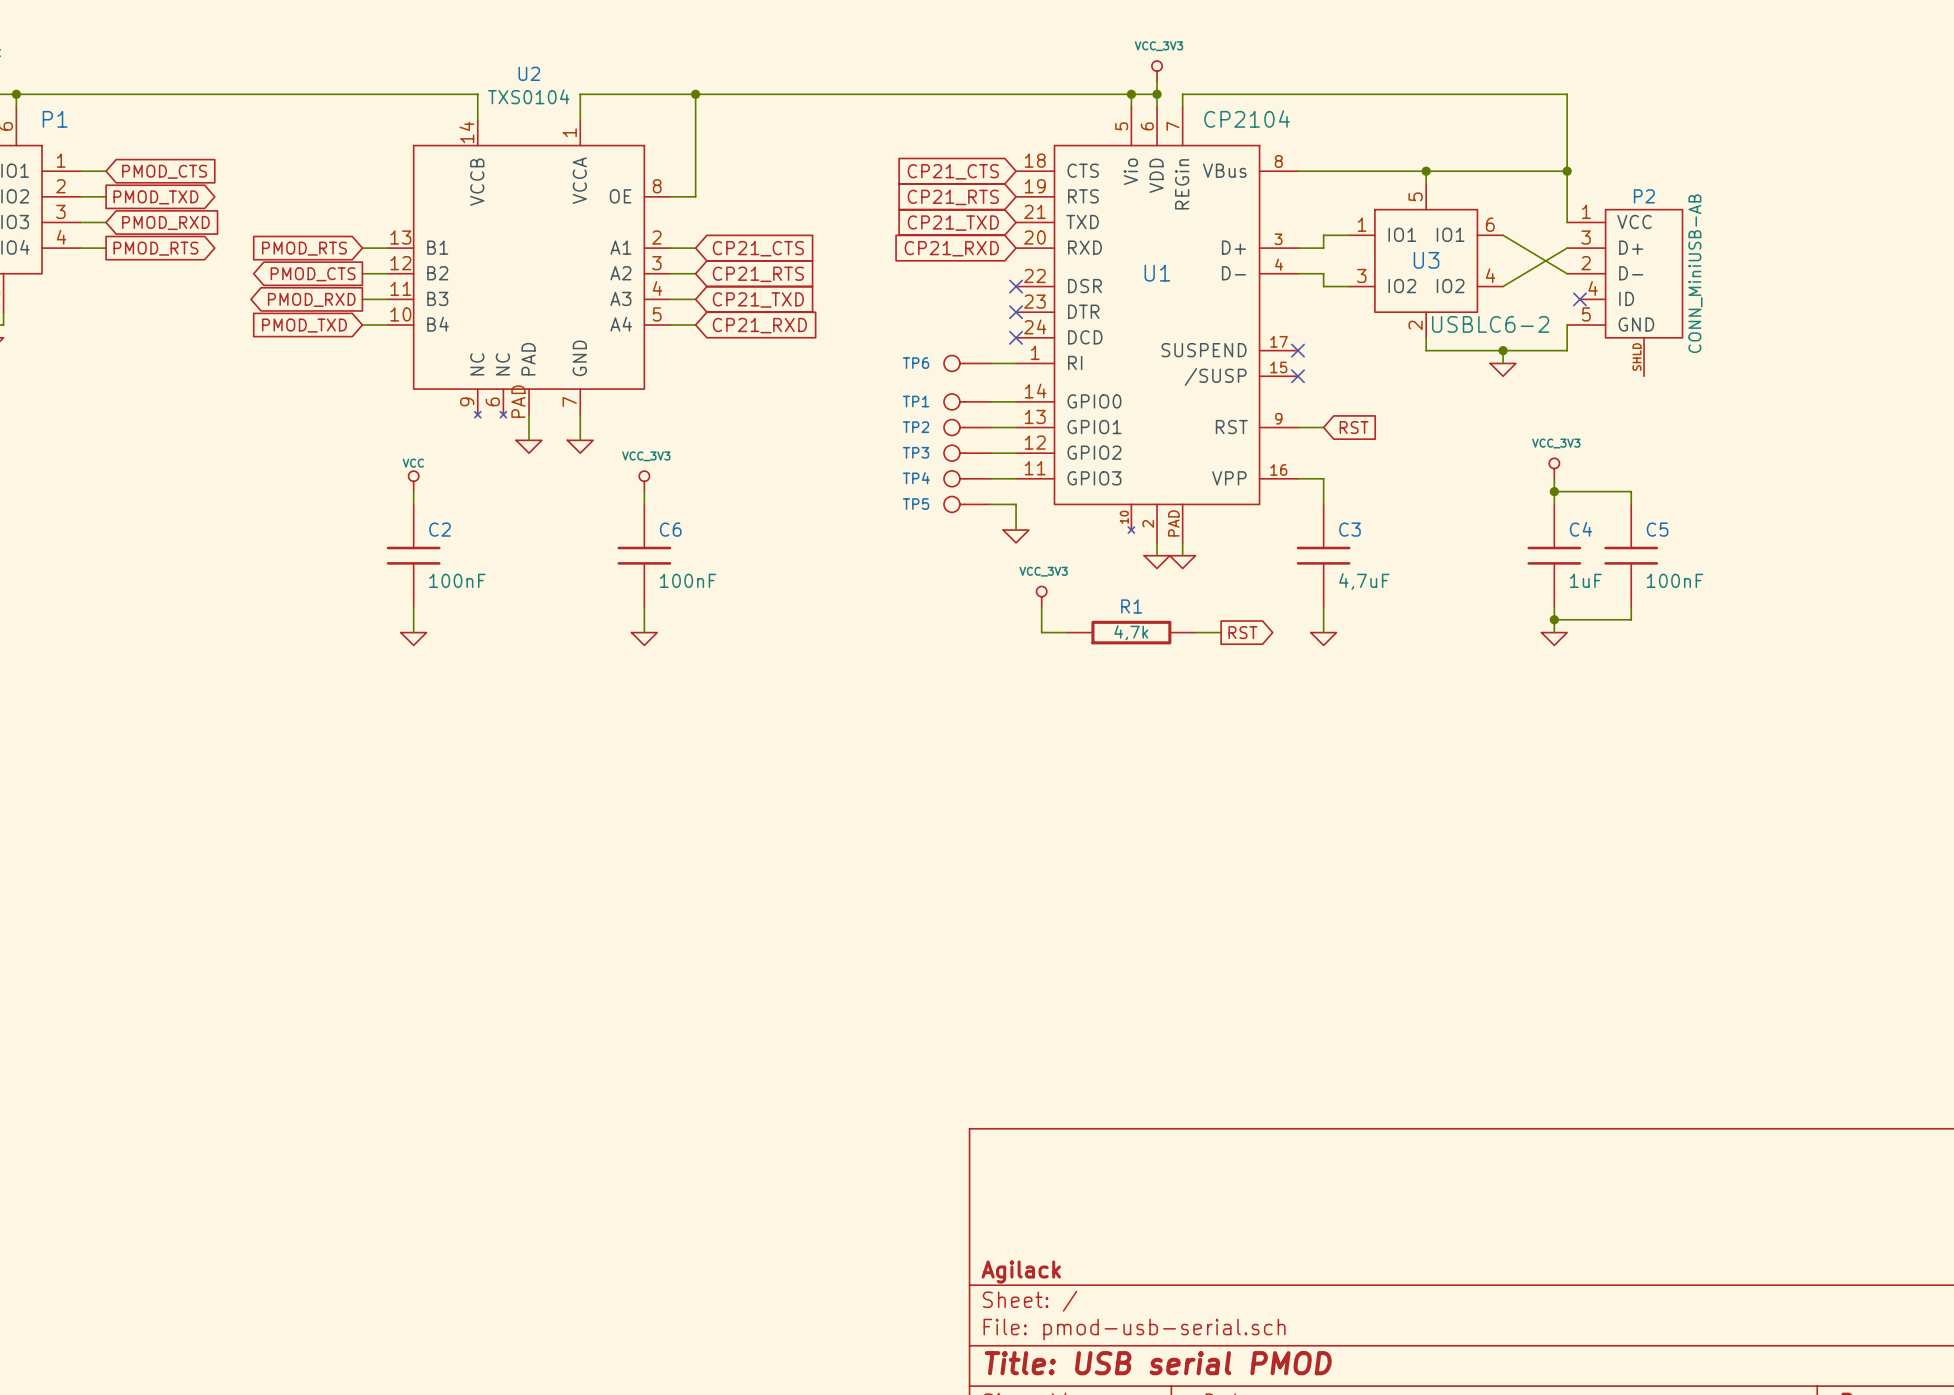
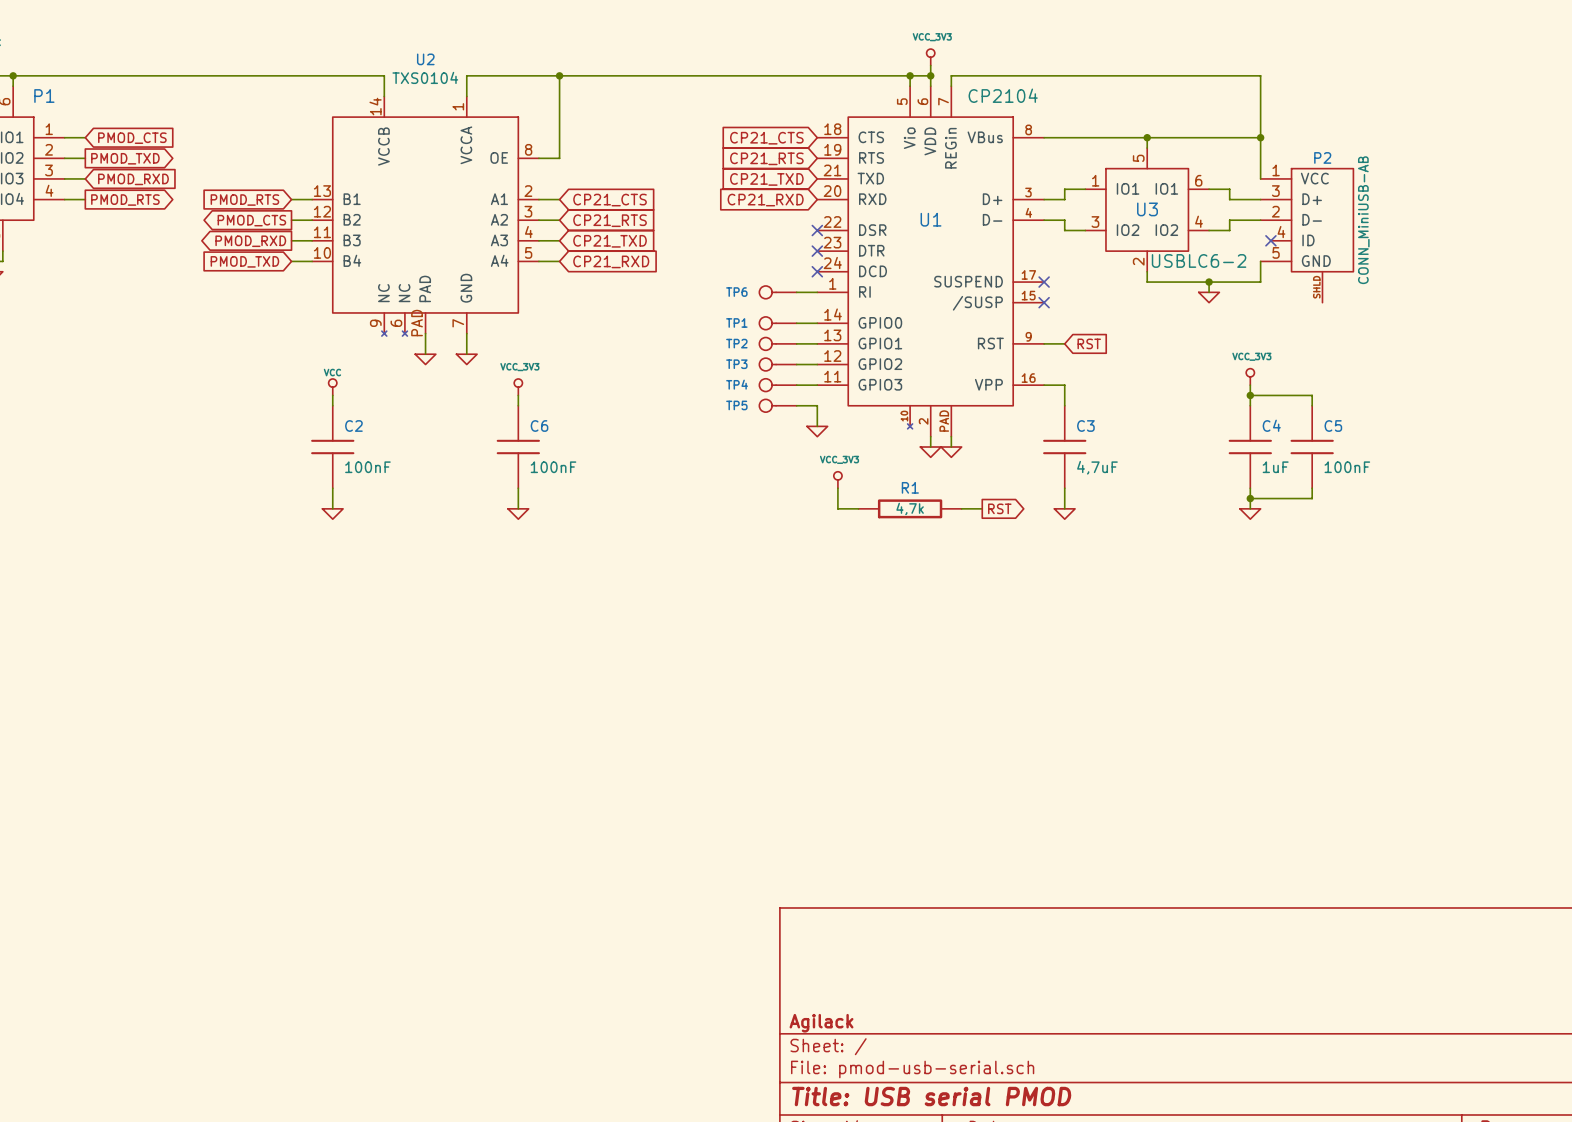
wire: (1503, 235) (1567, 273) -> (1209, 189) (1229, 189) (1229, 199) (1260, 199)
wire: (1567, 248) (1503, 286) -> (1260, 220) (1229, 220) (1229, 230) (1209, 230)

